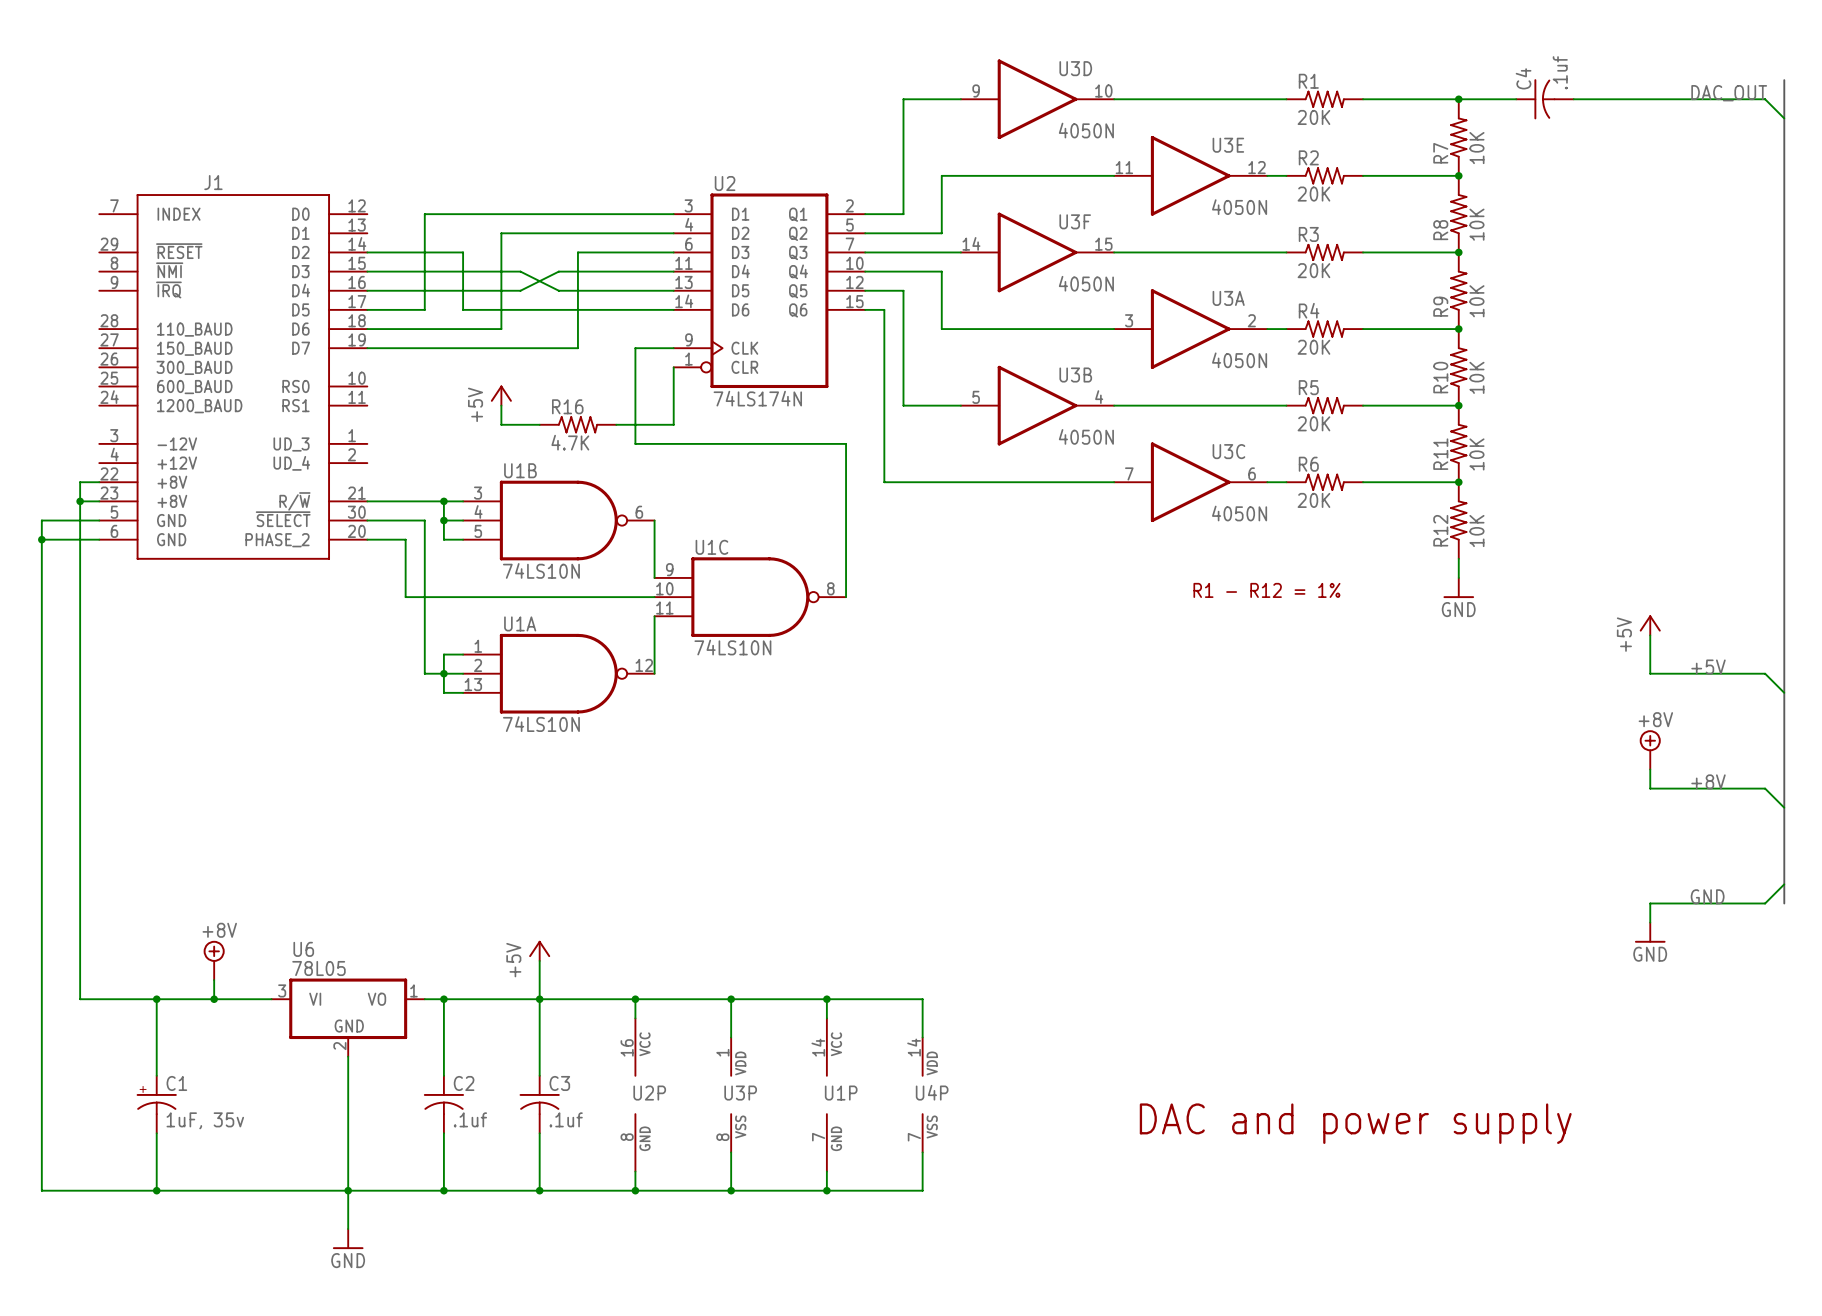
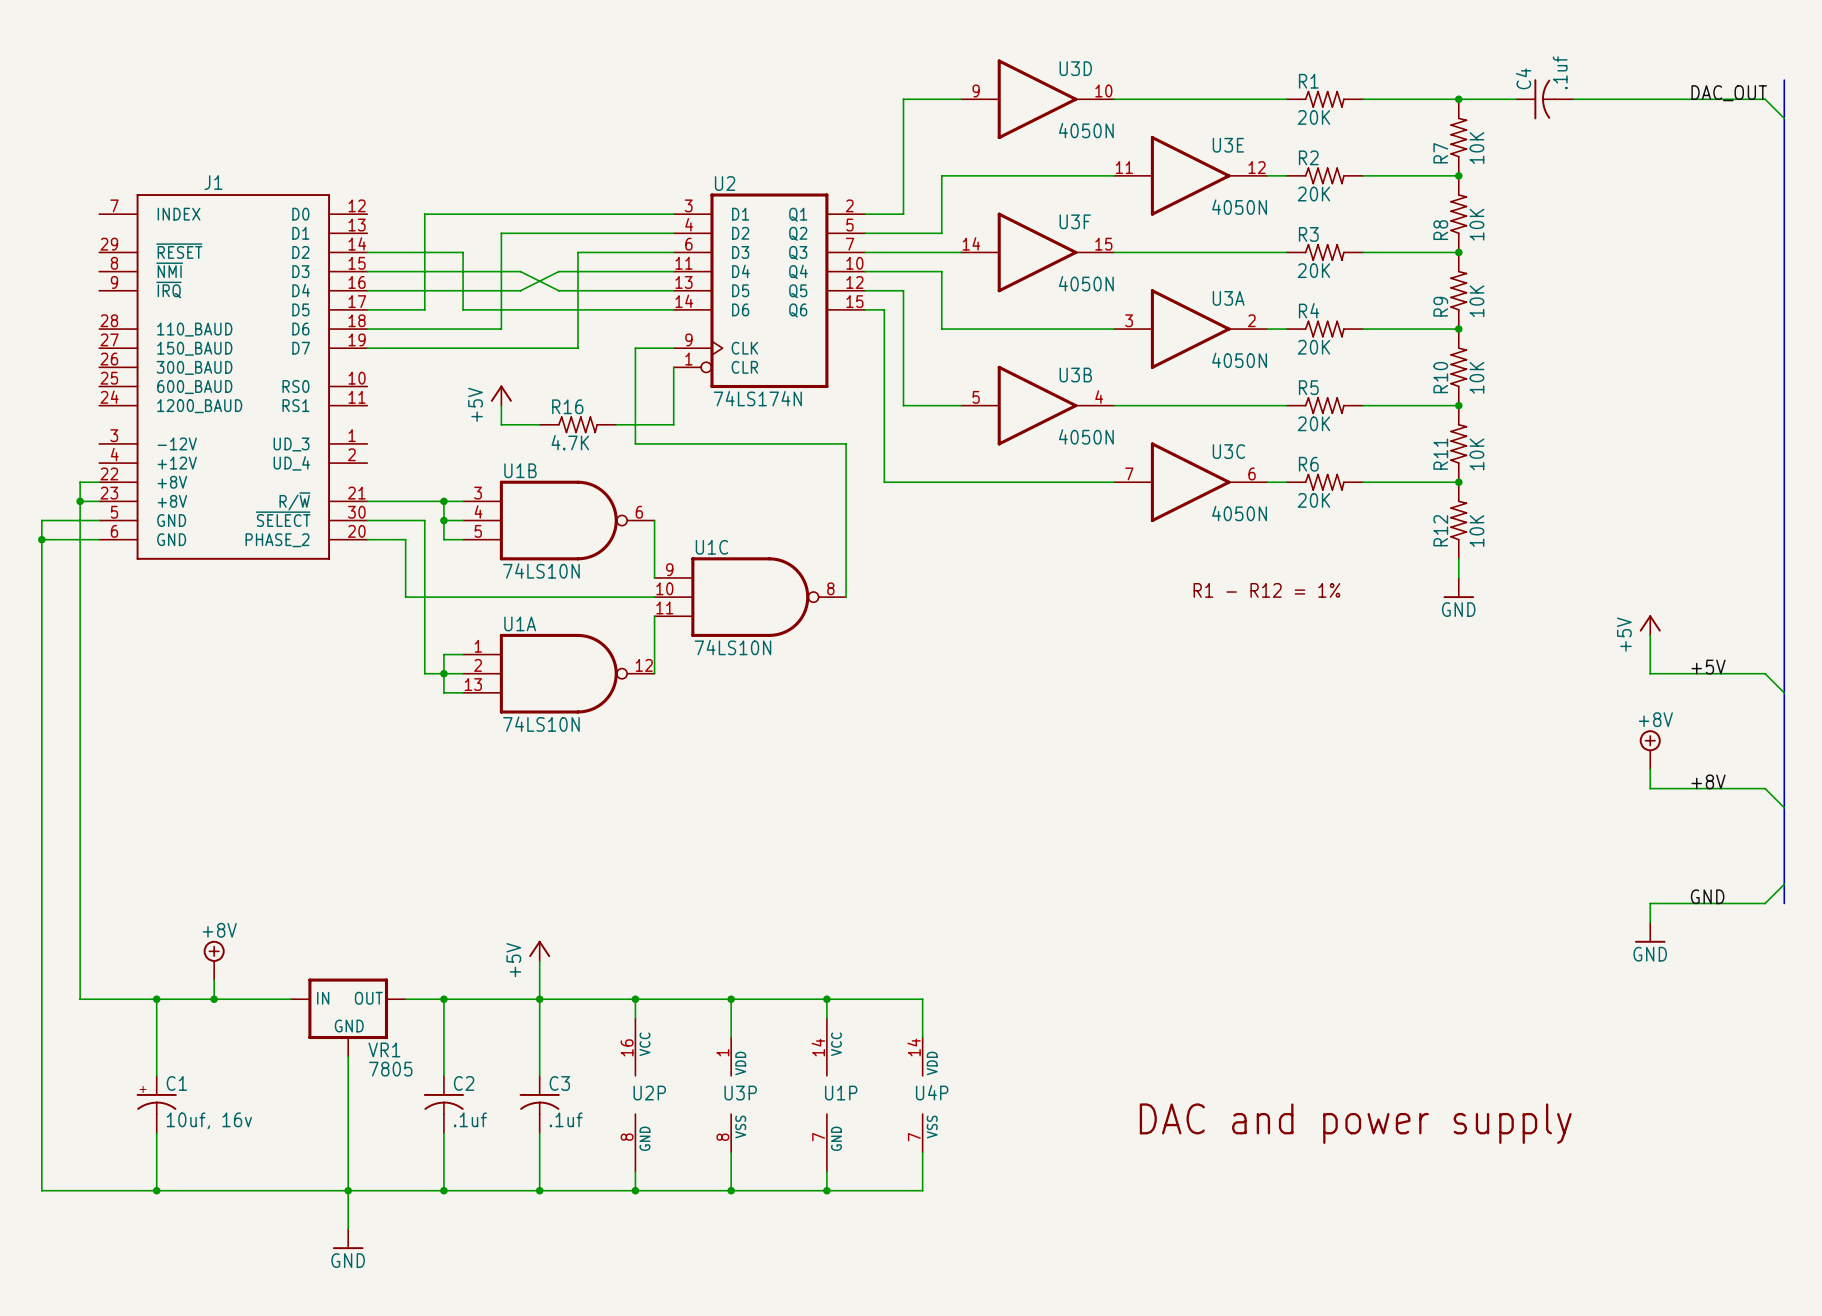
U6: 78L05 (348, 1017) -> none
VR1: none -> 7805 (348, 1017)
C1 value: 1uF, 35v (205, 1120) -> 10uf, 16v (209, 1120)

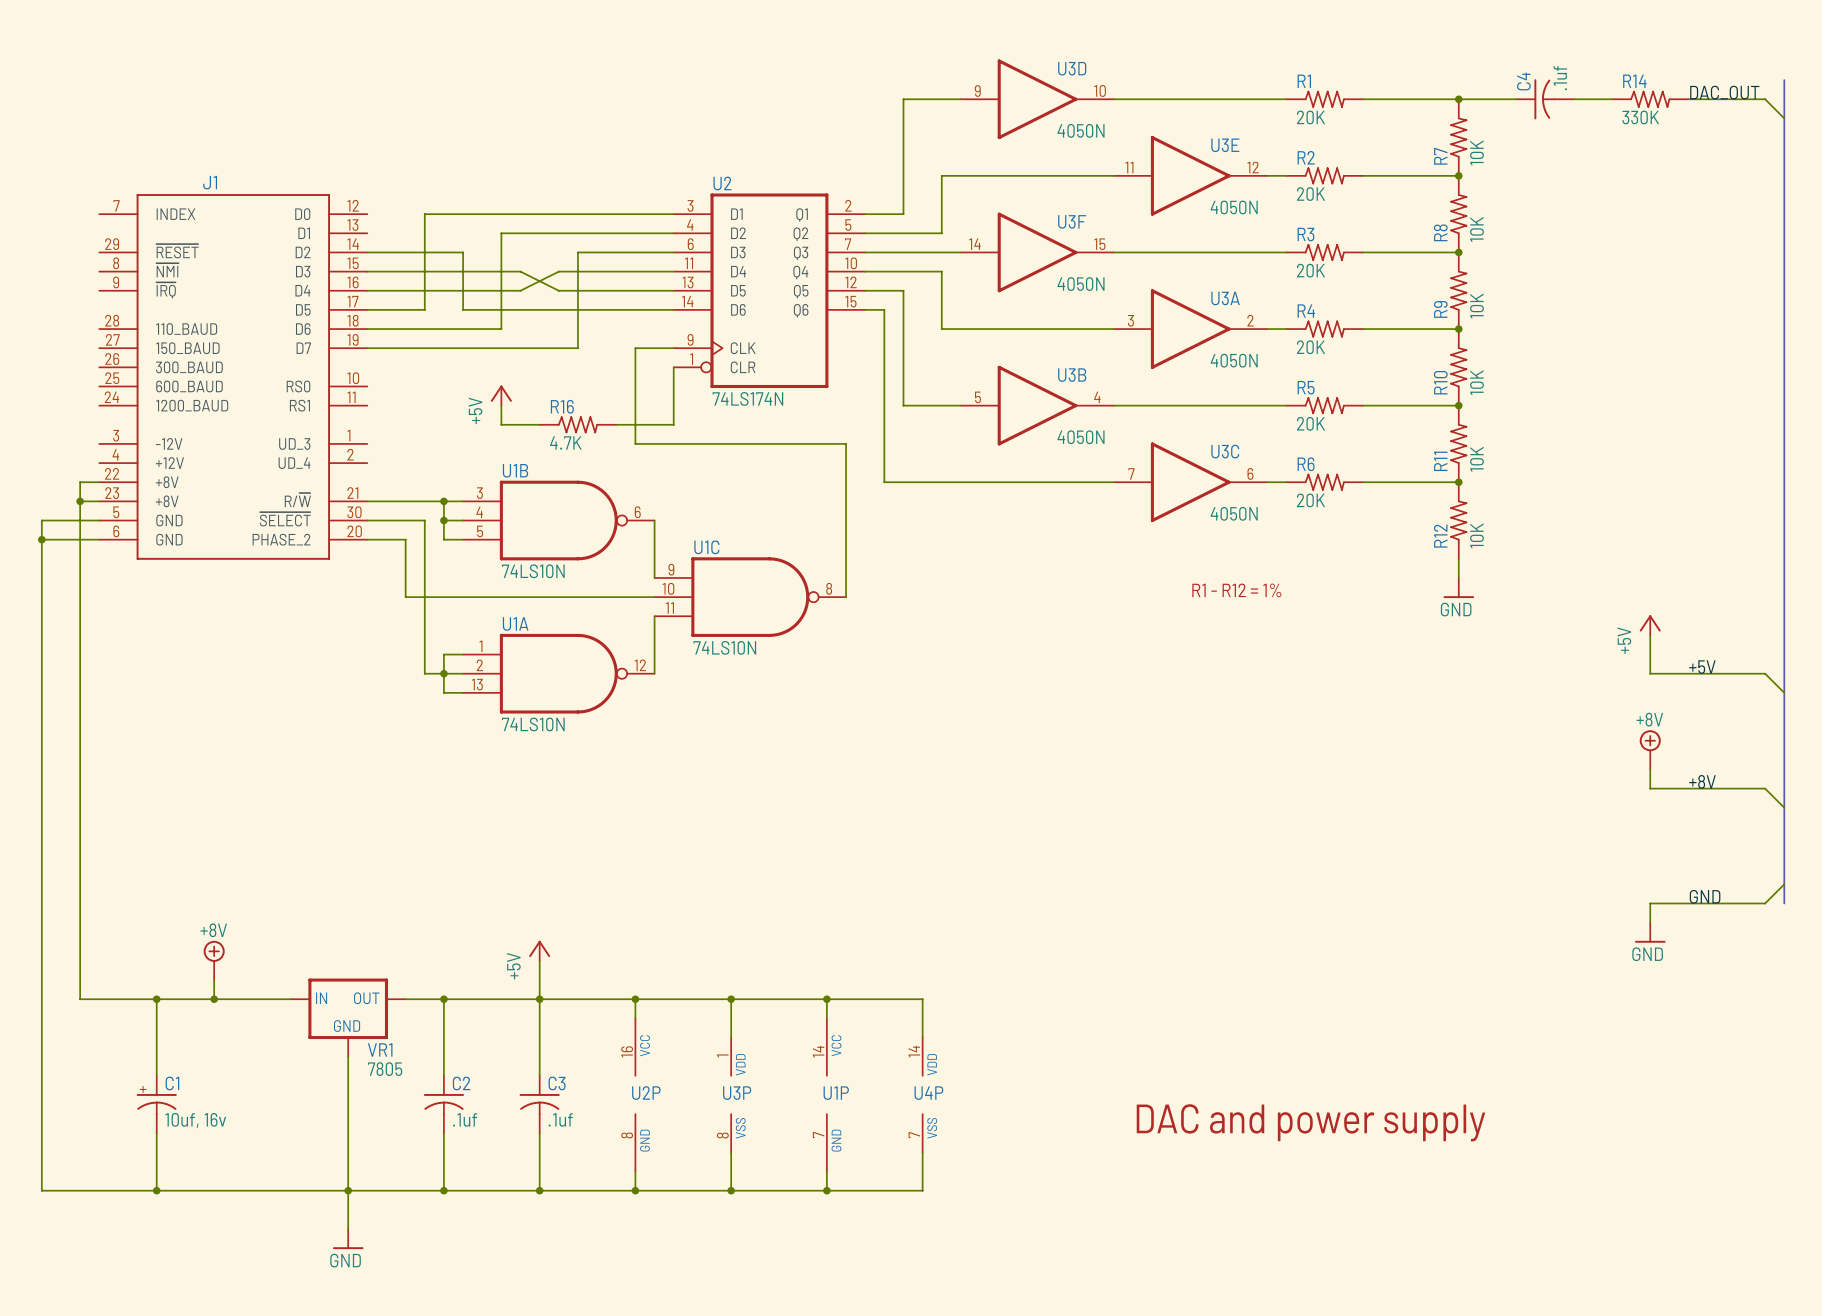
R14: none -> 330K (1650, 99)

